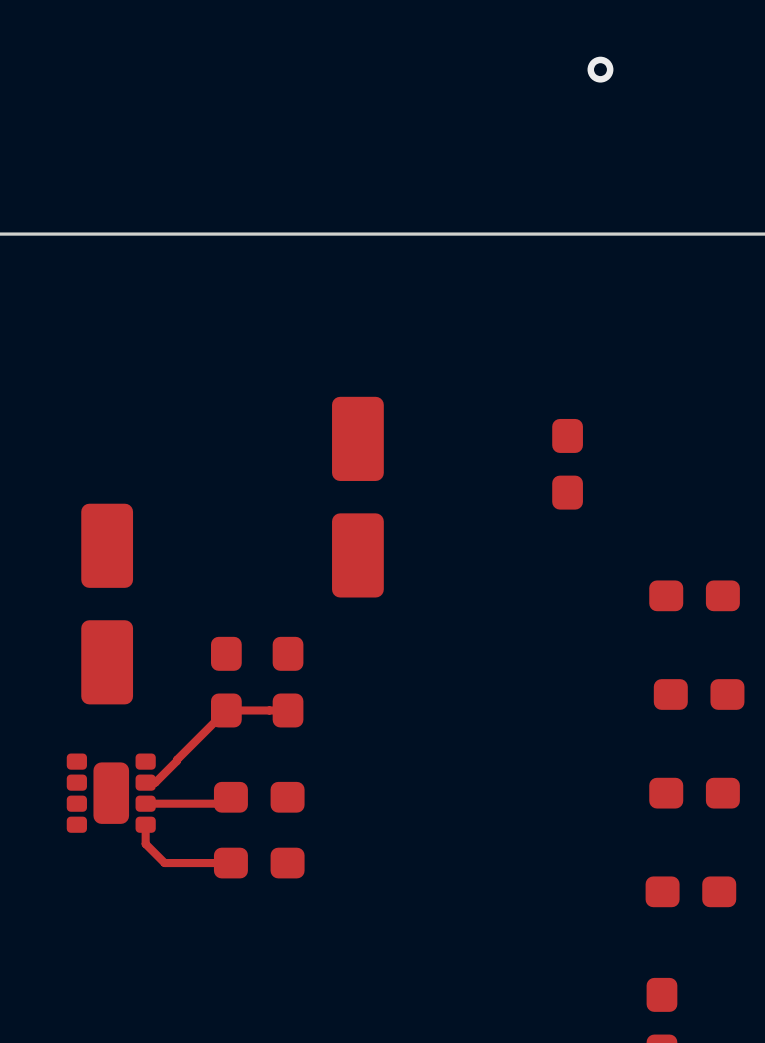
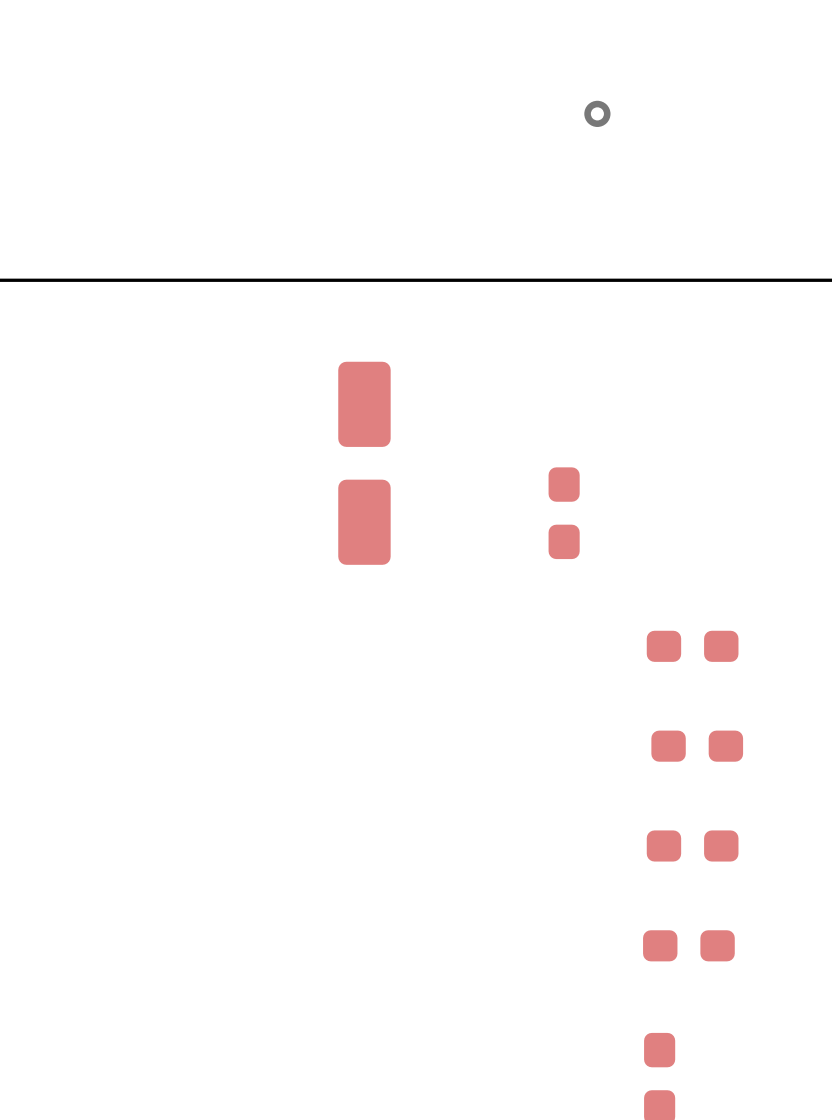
part position: (357, 497) -> (364, 463)
part: (107, 604) -> none
part: (226, 682) -> none
part: (288, 682) -> none
top track: (288, 710) (226, 710) (155, 782) (145, 782) -> none
part: (111, 793) -> none
top track: (230, 797) (224, 803) (145, 803) -> none
part: (259, 797) -> none
top track: (145, 824) (145, 844) (164, 863) (230, 863) -> none
part: (259, 863) -> none

